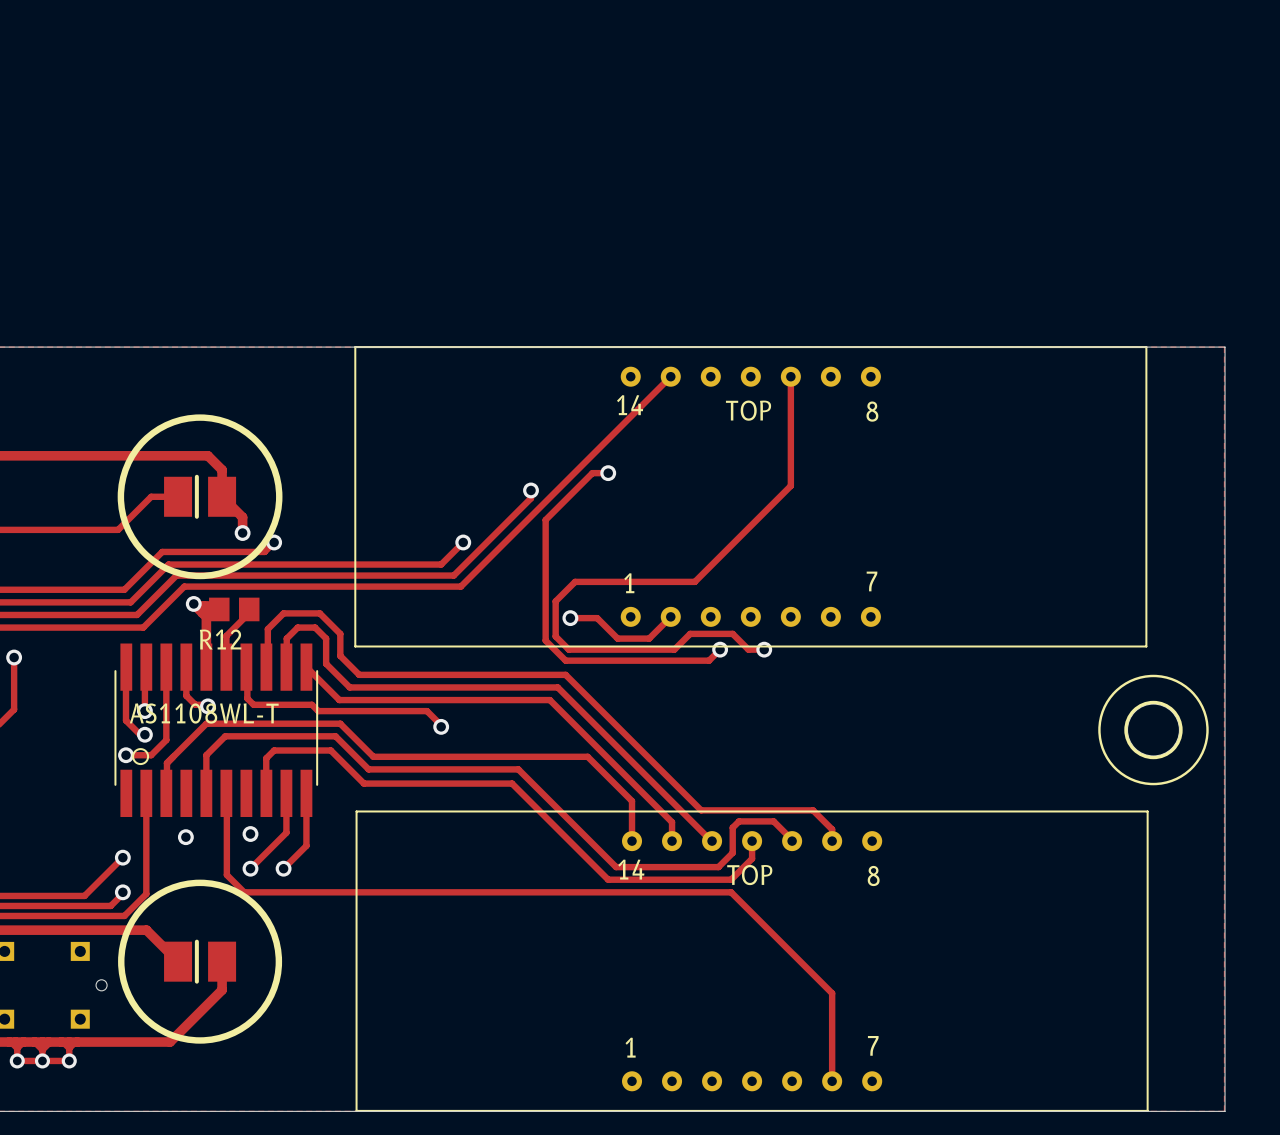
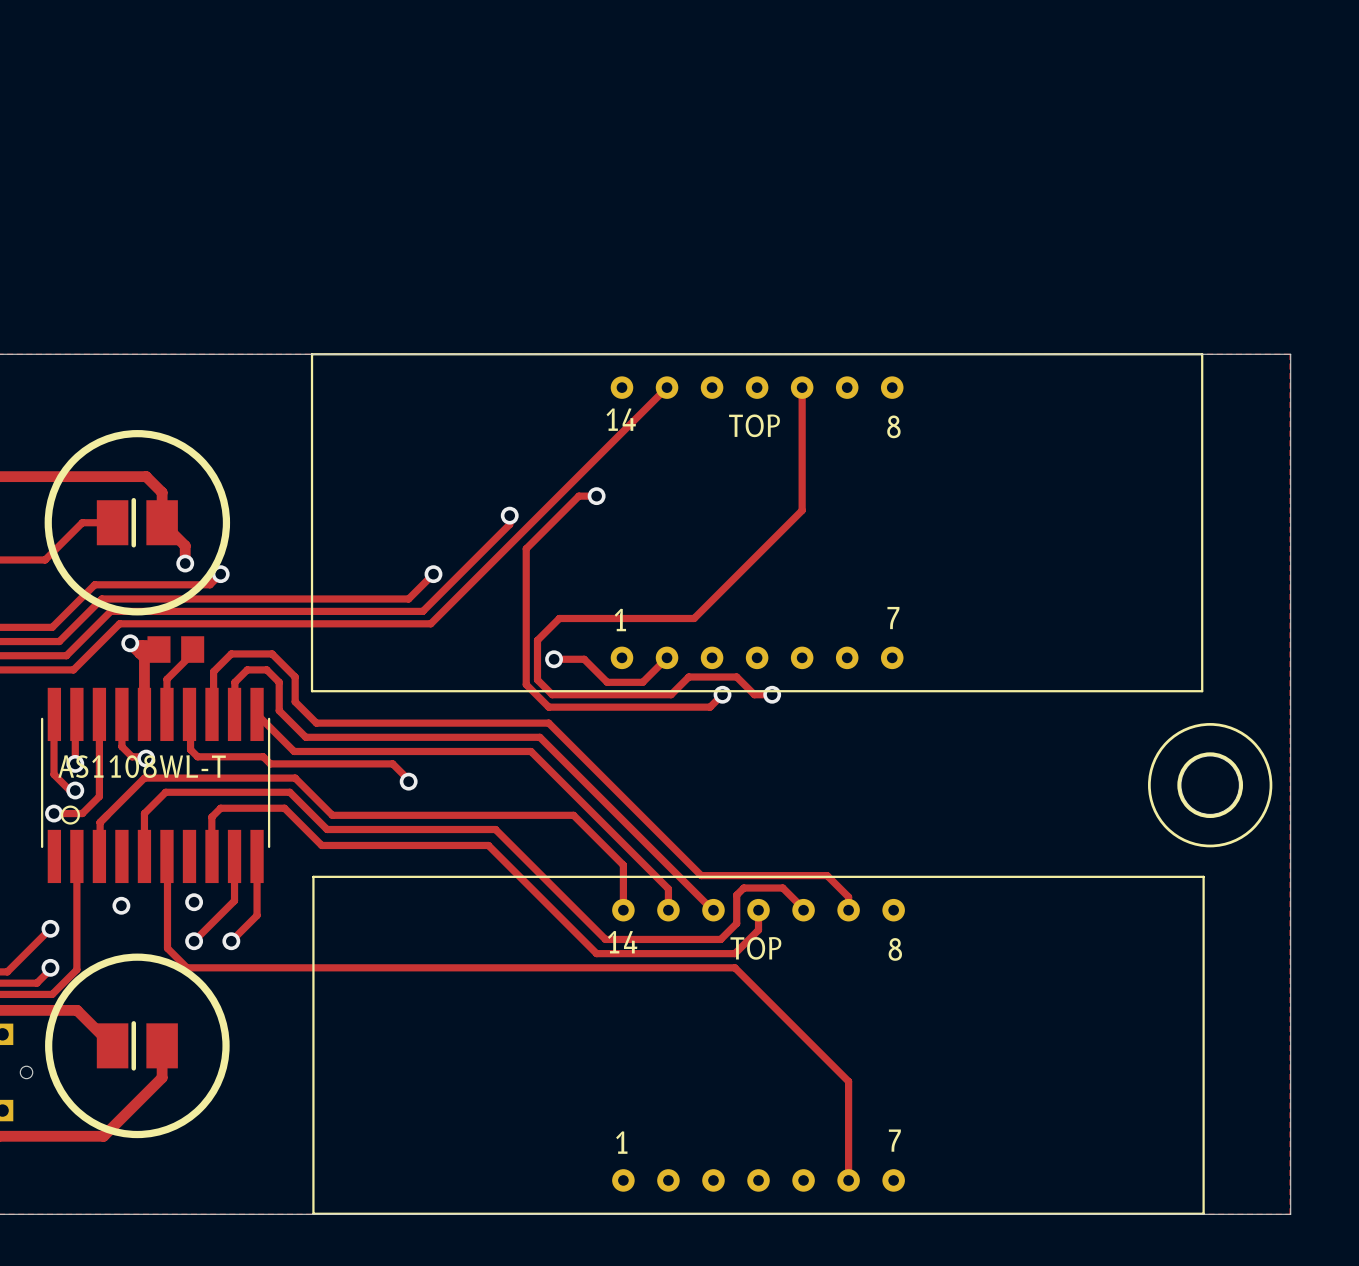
R12 name: R12 (220, 639) -> none

